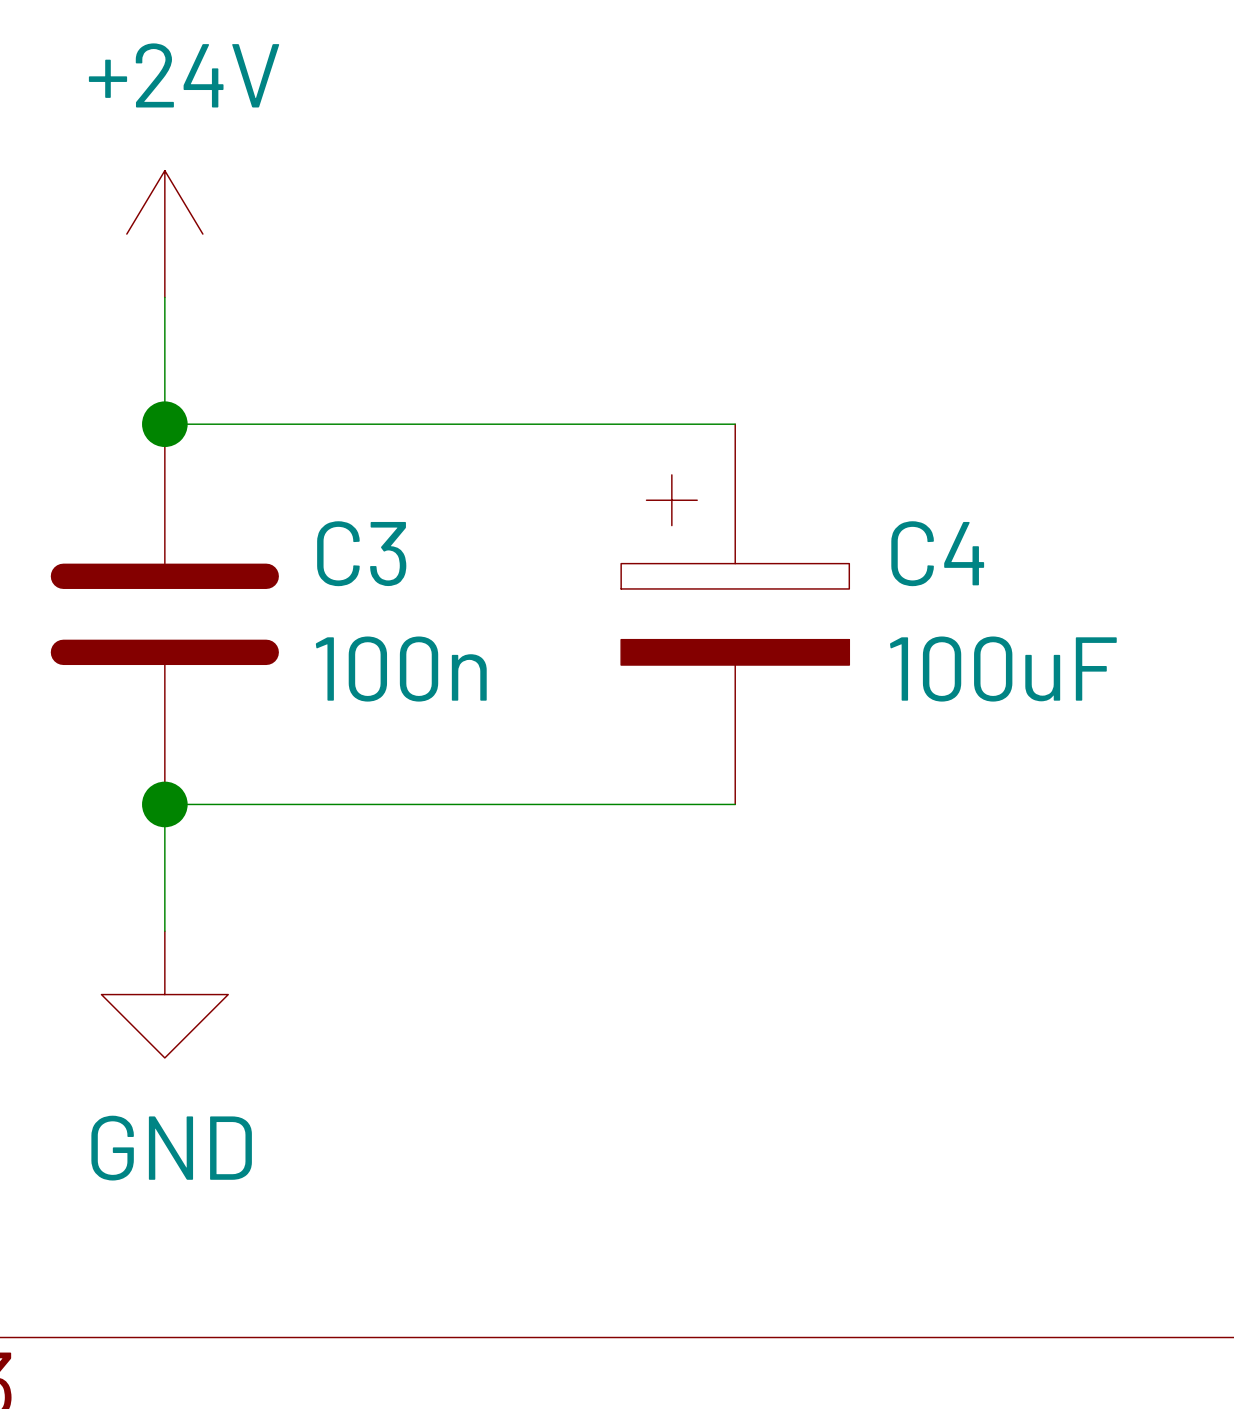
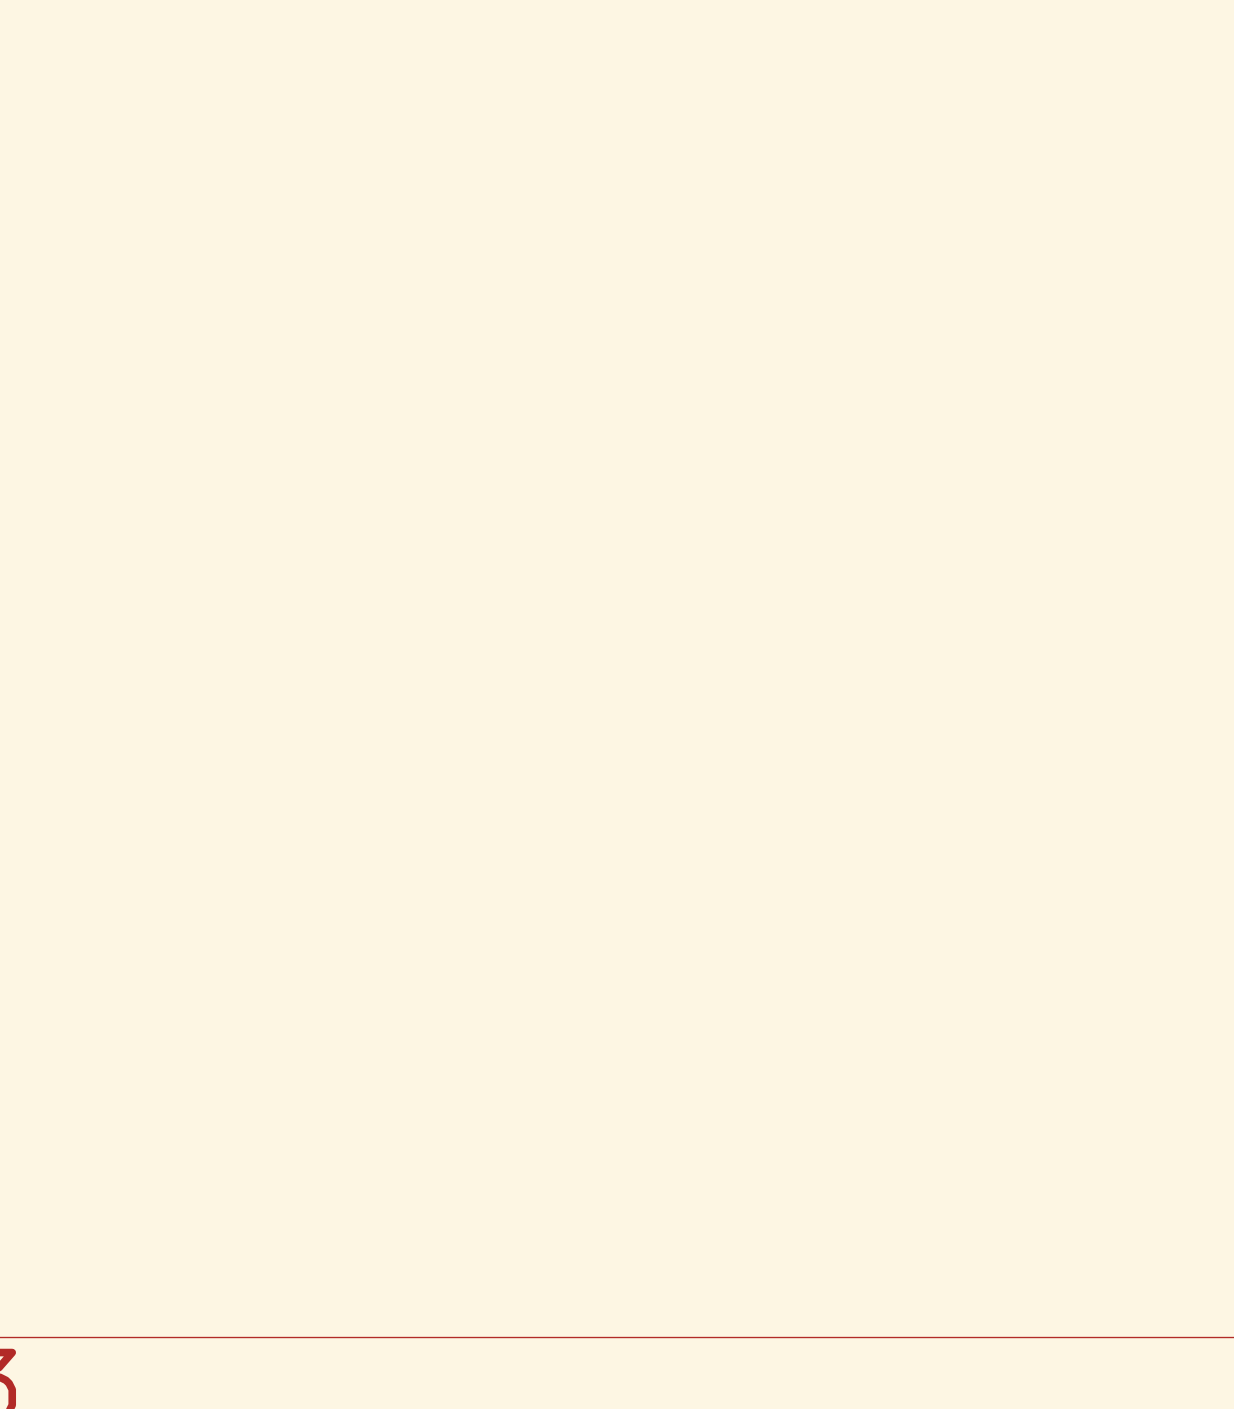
power symbol: +24V (164, 234) -> none
wire: (164, 297) (164, 424) (735, 424) -> none
junction: (164, 424) -> none
C3: 100n (164, 614) -> none
C4: 100uF (735, 614) -> none
junction: (164, 804) -> none
wire: (735, 804) (164, 804) (164, 931) -> none
power symbol: GND (164, 994) -> none

